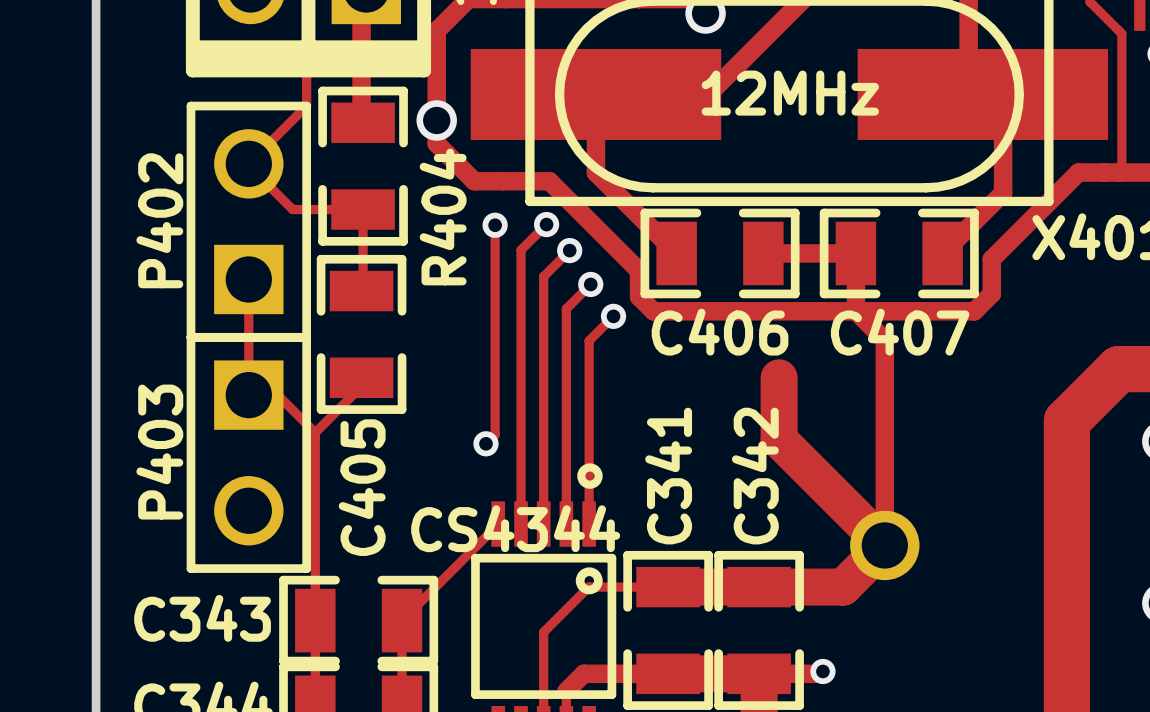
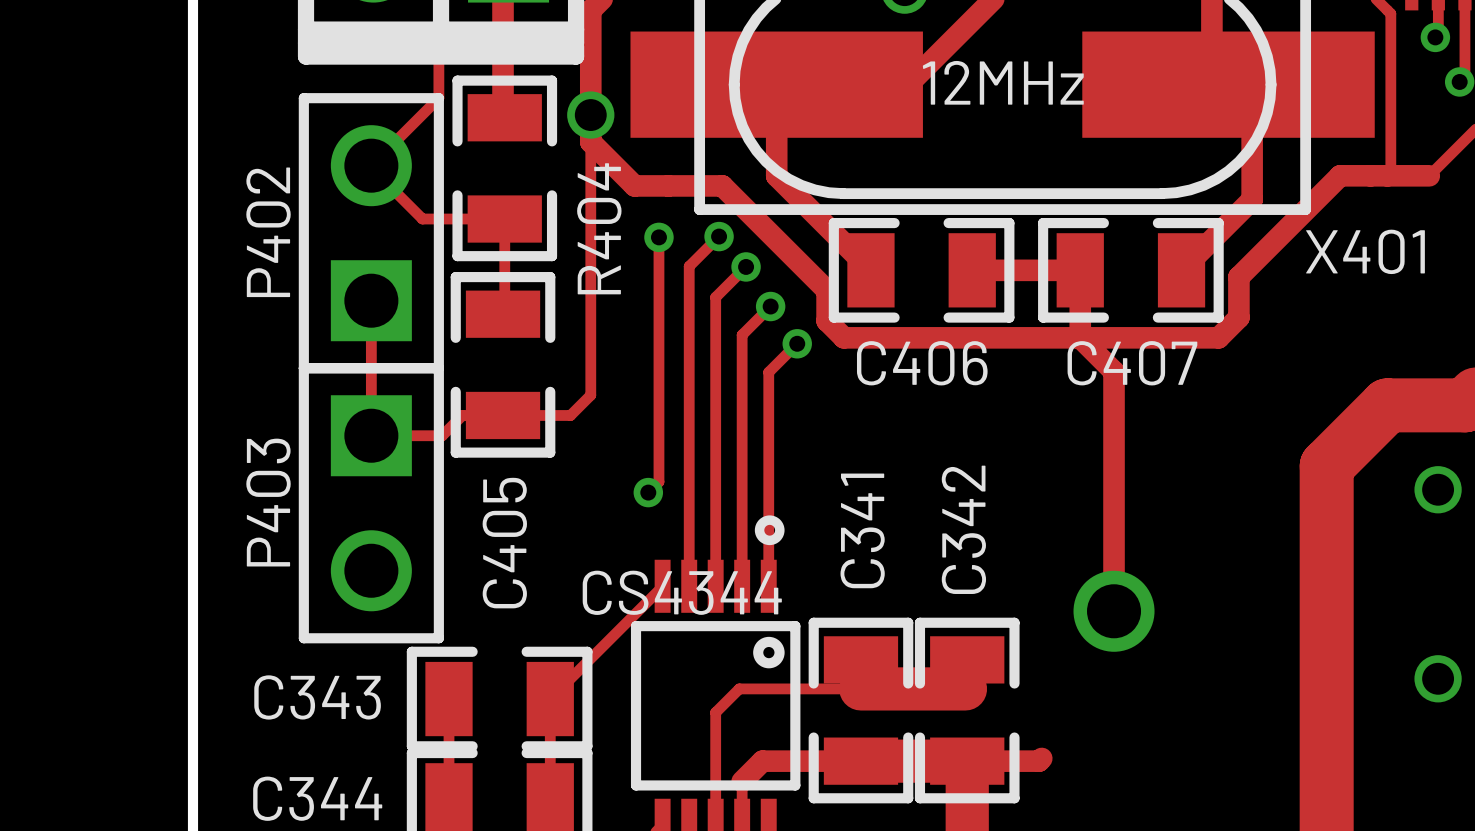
track: (361, 377) (361, 386) (315, 432) -> none
track: (779, 377) (779, 439) (884, 545) (843, 587) (588, 587) (563, 611) -> (965, 688) (739, 688)
track: (277, 395) (315, 432) -> (405, 435) (442, 435) (462, 415) (570, 415) (590, 395) (590, 115)
track: (315, 432) (315, 620) -> none
via: (822, 671) -> none

